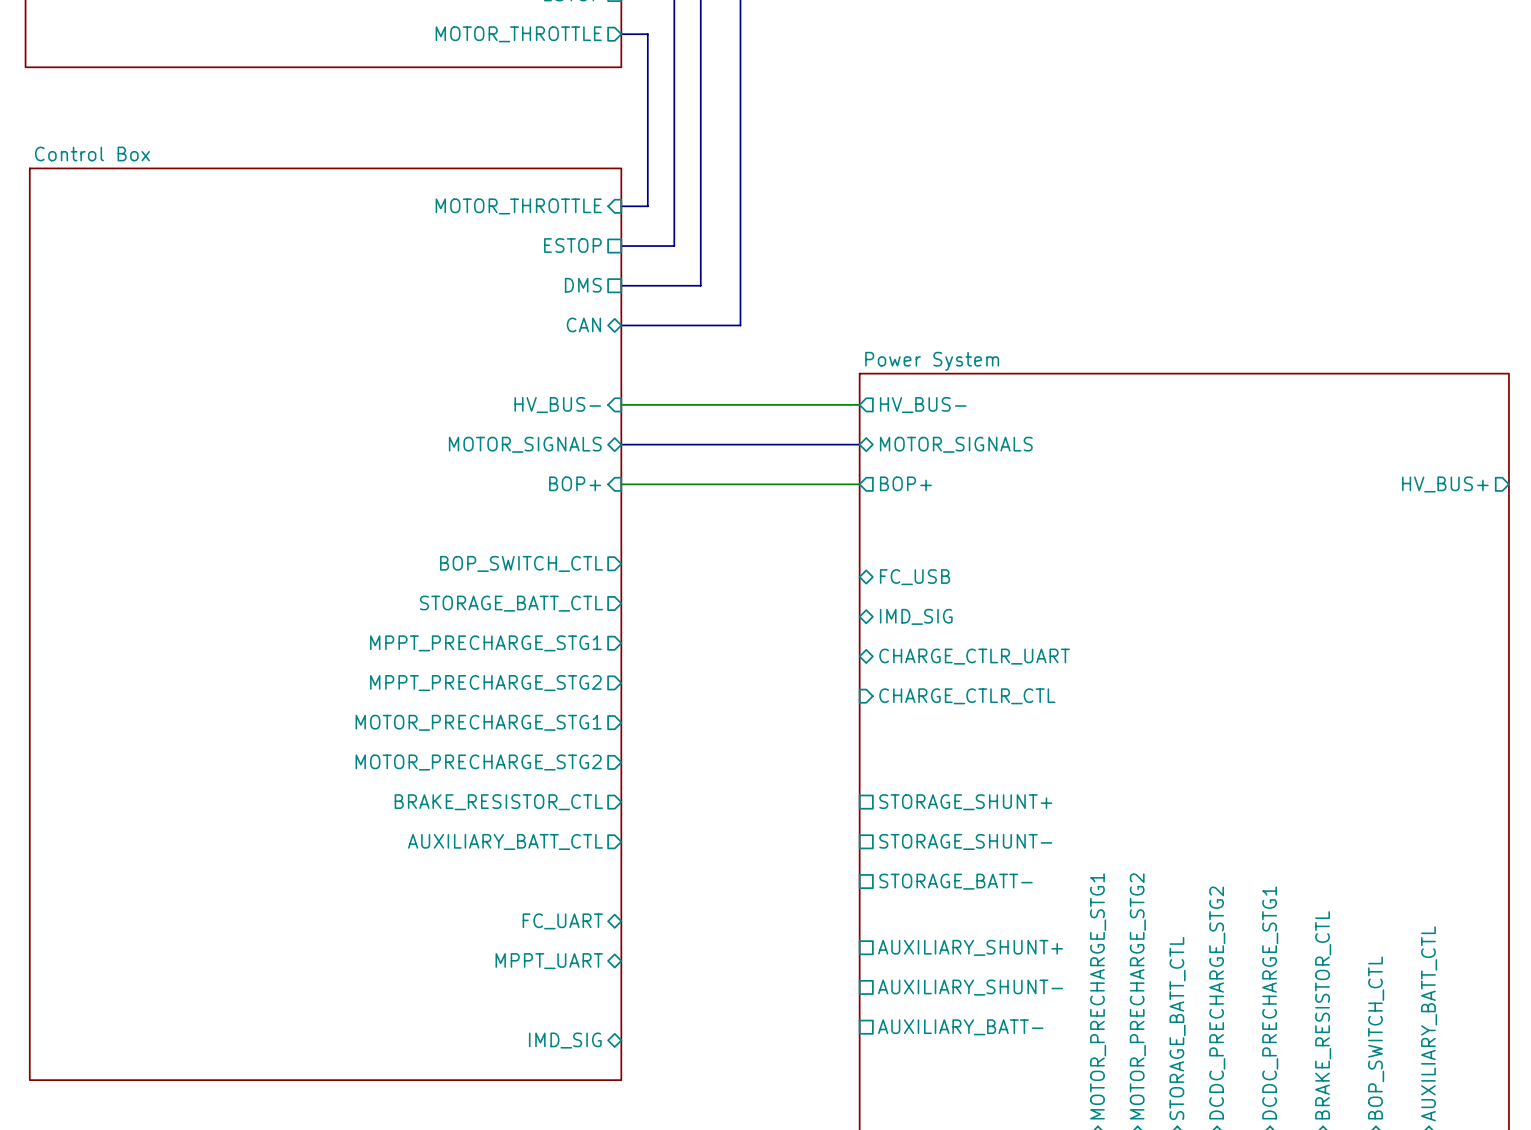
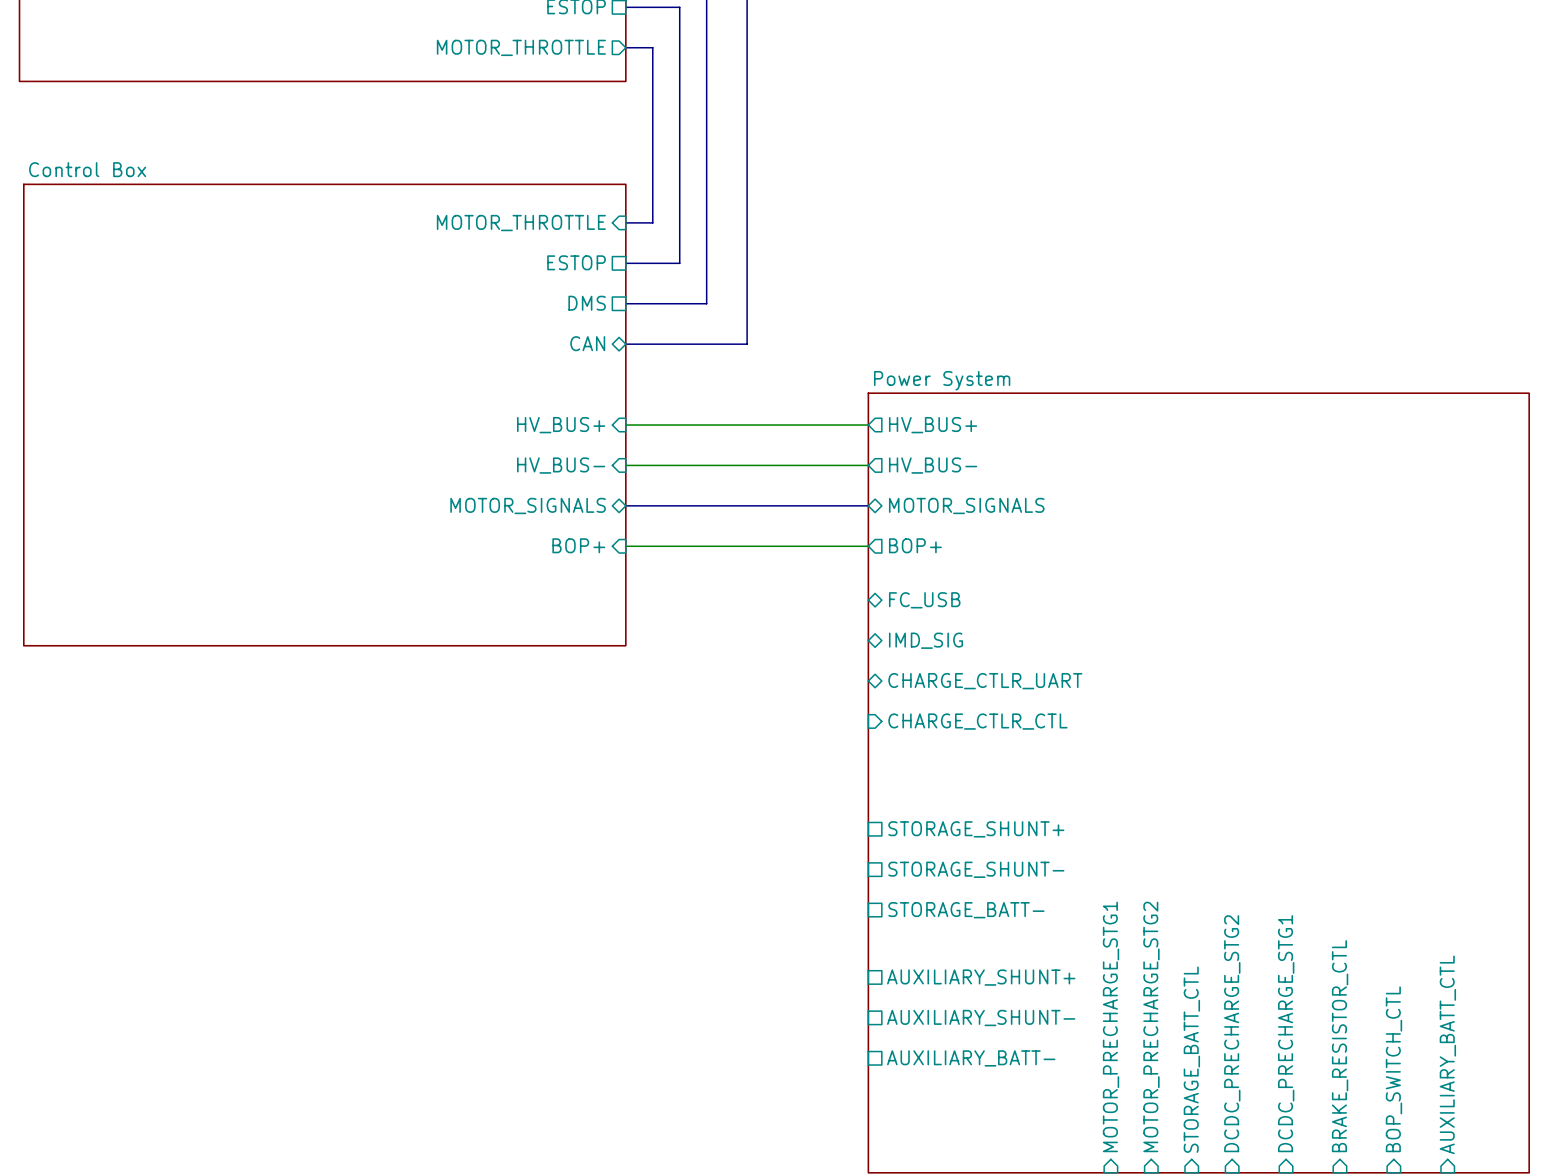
sheet Control Box: none -> (324, 415)
sheet pin: HV_BUS- (557, 405) -> HV_BUS+ (561, 425)
sheet pin: HV_BUS- (923, 405) -> HV_BUS+ (933, 425)
sheet pin shape: bidirectional (525, 444) -> input (561, 465)
sheet pin: MOTOR_SIGNALS (525, 444) -> HV_BUS- (561, 465)
bus: (621, 444) (859, 444) -> (625, 505) (868, 505)
sheet pin shape: bidirectional (956, 444) -> output (933, 465)
sheet pin: MOTOR_SIGNALS (956, 444) -> HV_BUS- (933, 465)
sheet pin shape: input (575, 483) -> bidirectional (528, 505)
sheet pin: BOP+ (575, 483) -> MOTOR_SIGNALS (528, 505)
sheet pin shape: output (905, 483) -> bidirectional (966, 505)
sheet pin: BOP+ (905, 483) -> MOTOR_SIGNALS (966, 505)
sheet pin: HV_BUS+ (1445, 484) -> none
sheet pin: none -> BOP+ (578, 545)
sheet pin: none -> BOP+ (915, 545)
wire: none -> (625, 546) (868, 546)
sheet pin: BOP_SWITCH_CTL (521, 563) -> none
sheet pin: STORAGE_BATT_CTL (511, 603) -> none
sheet Control Box: (325, 624) -> none
sheet pin: MPPT_PRECHARGE_STG1 (485, 643) -> none
sheet pin: MPPT_PRECHARGE_STG2 (485, 683) -> none
sheet pin: MOTOR_PRECHARGE_STG1 (478, 722) -> none
sheet pin: MOTOR_PRECHARGE_STG2 (478, 762) -> none
sheet pin: BRAKE_RESISTOR_CTL (498, 802) -> none
sheet pin: AUXILIARY_BATT_CTL (505, 841) -> none
sheet pin: FC_UART (562, 921) -> none
sheet pin: MPPT_UART (549, 961) -> none
sheet pin: IMD_SIG (565, 1040) -> none

